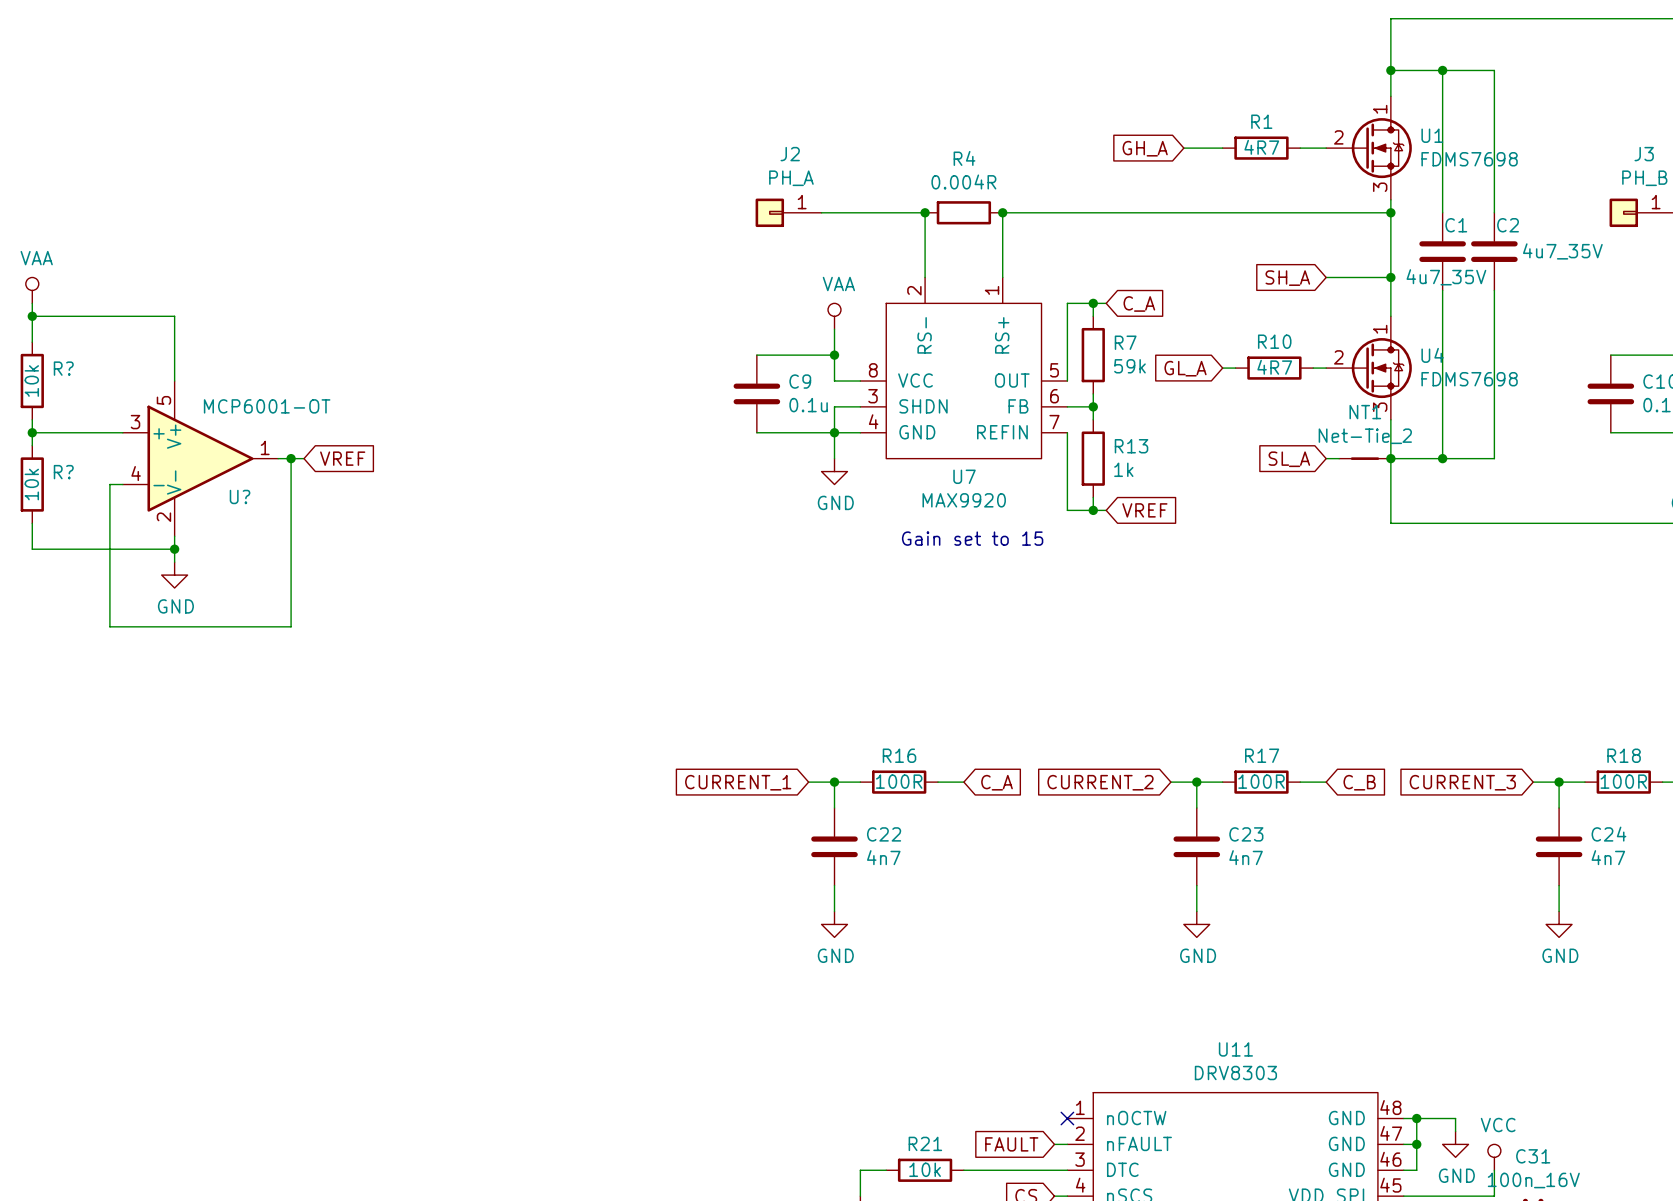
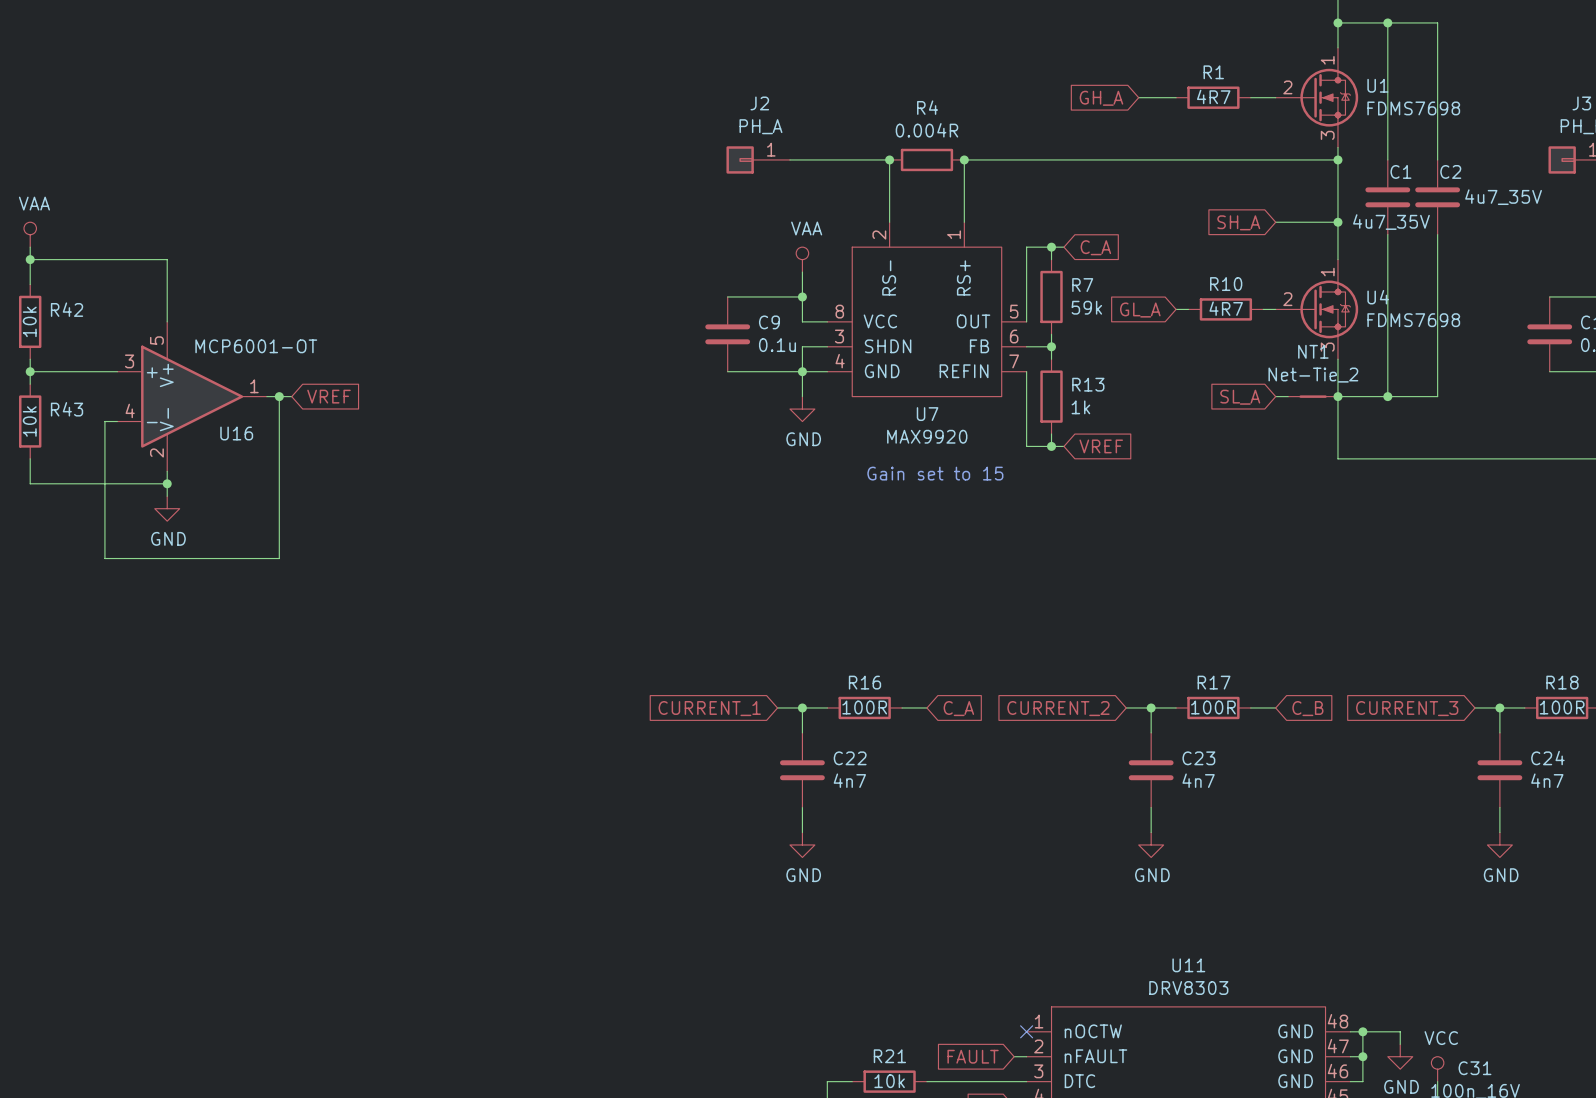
R? name: R? (63, 368) -> R42 (67, 309)
R? name: R? (63, 472) -> R43 (67, 409)
U? name: U? (240, 496) -> U16 (236, 433)

